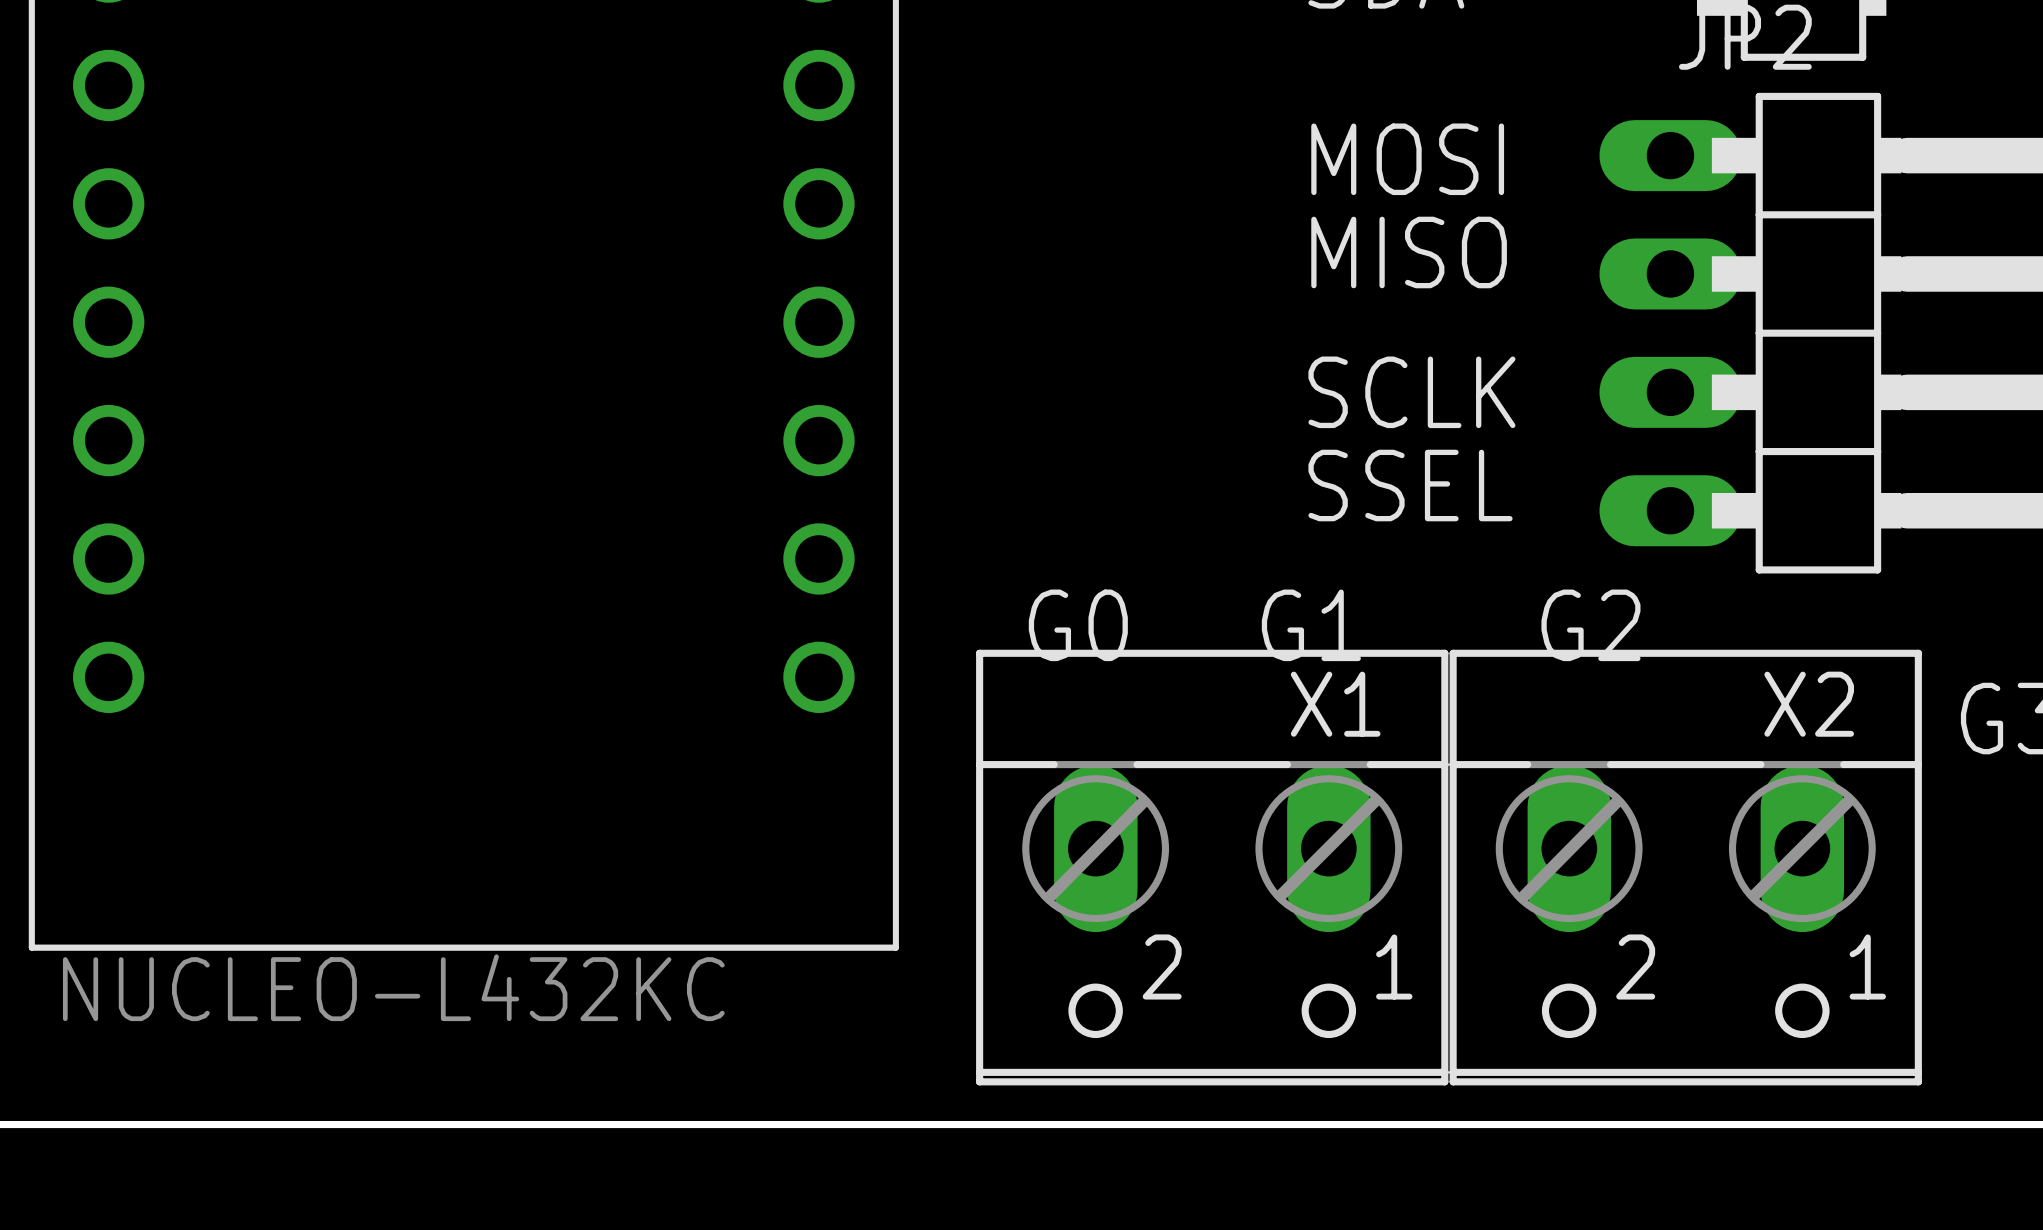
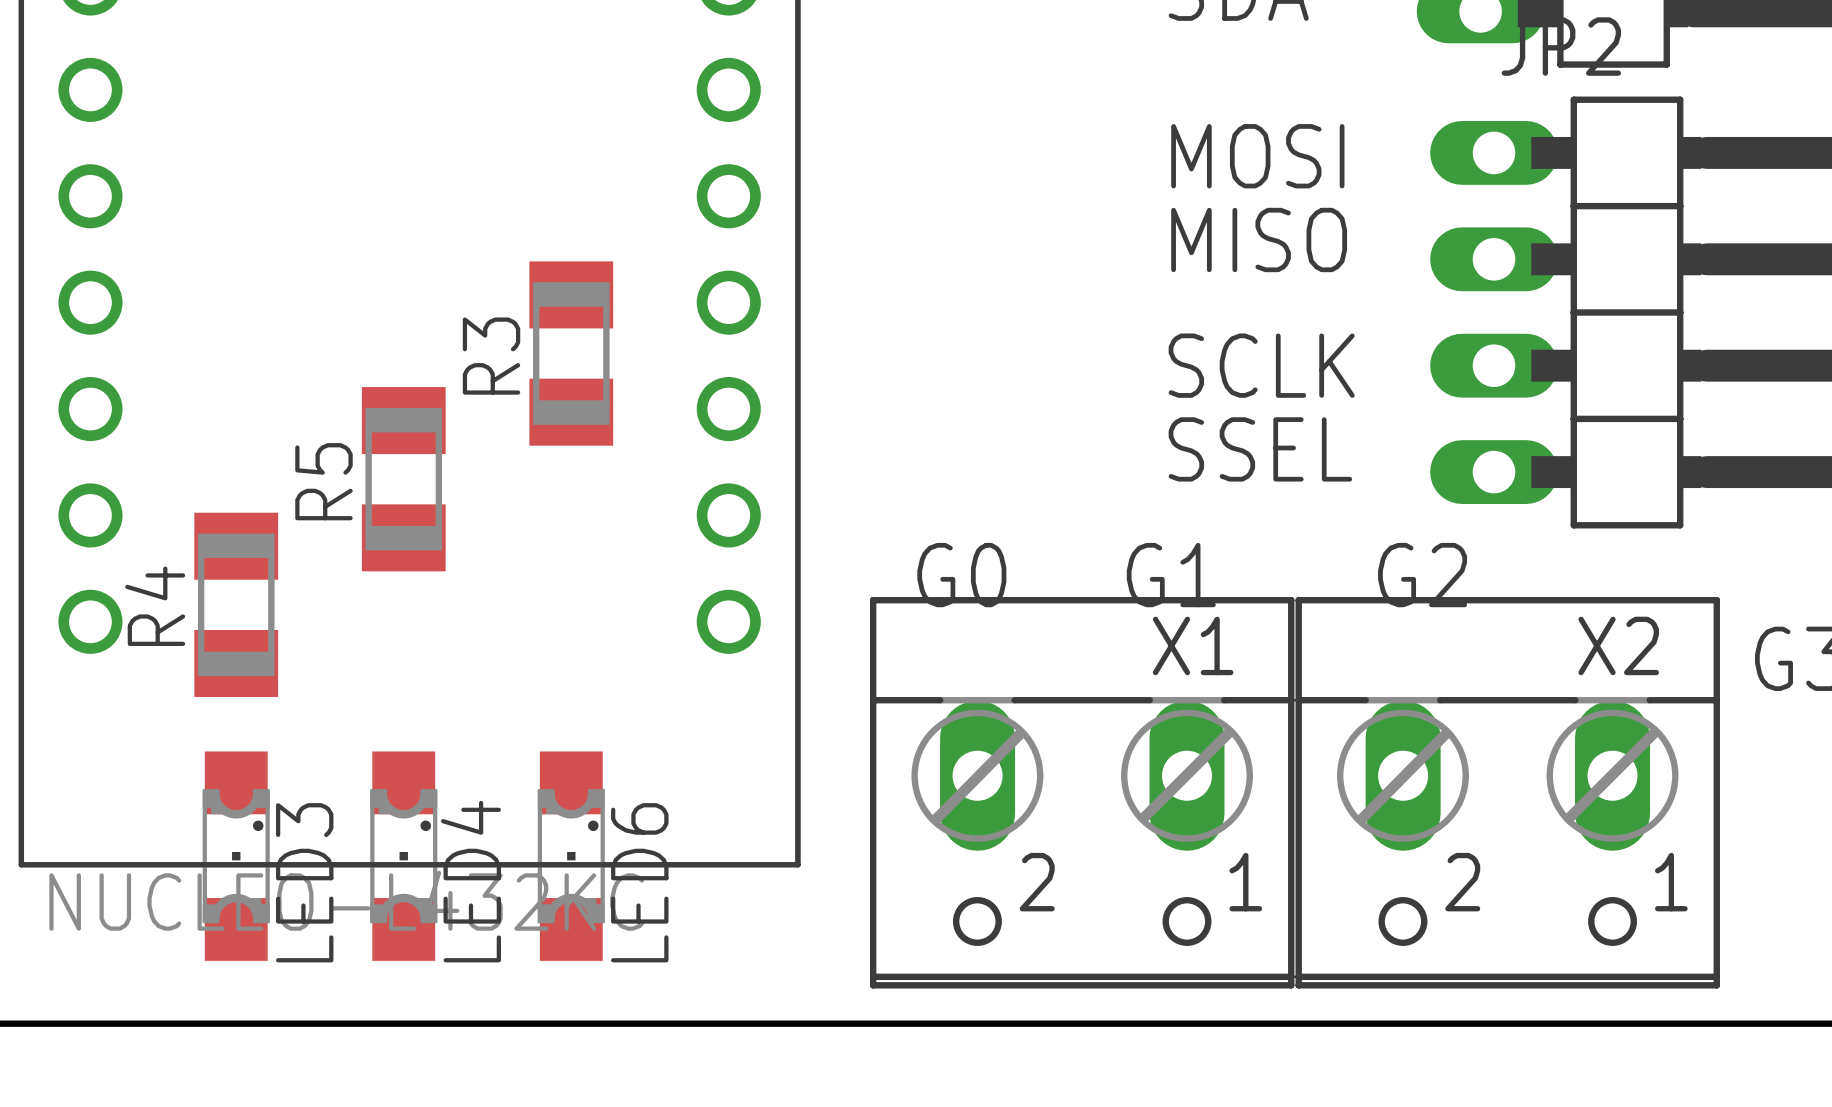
R3: none -> (571, 353)
R5: none -> (403, 479)
R4: none -> (236, 604)
LED3: none -> (236, 856)
LED4: none -> (403, 856)
LED6: none -> (571, 856)

